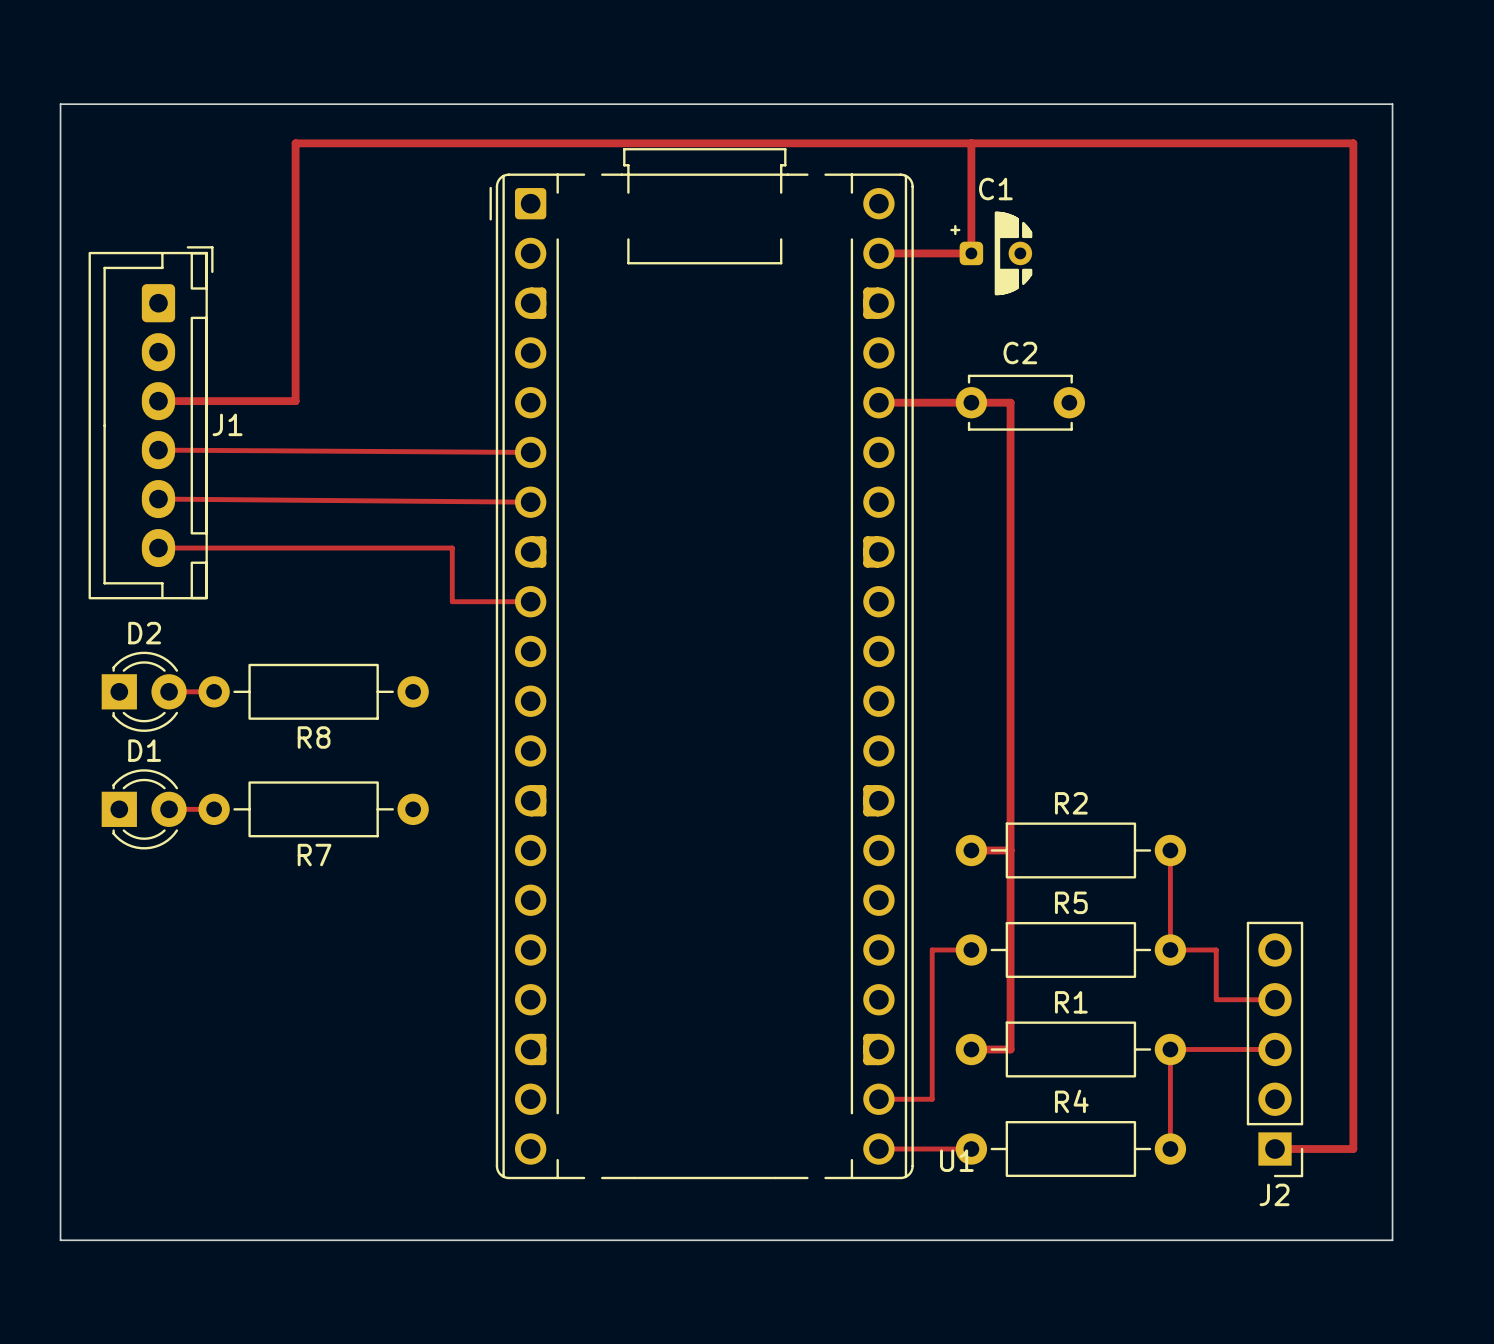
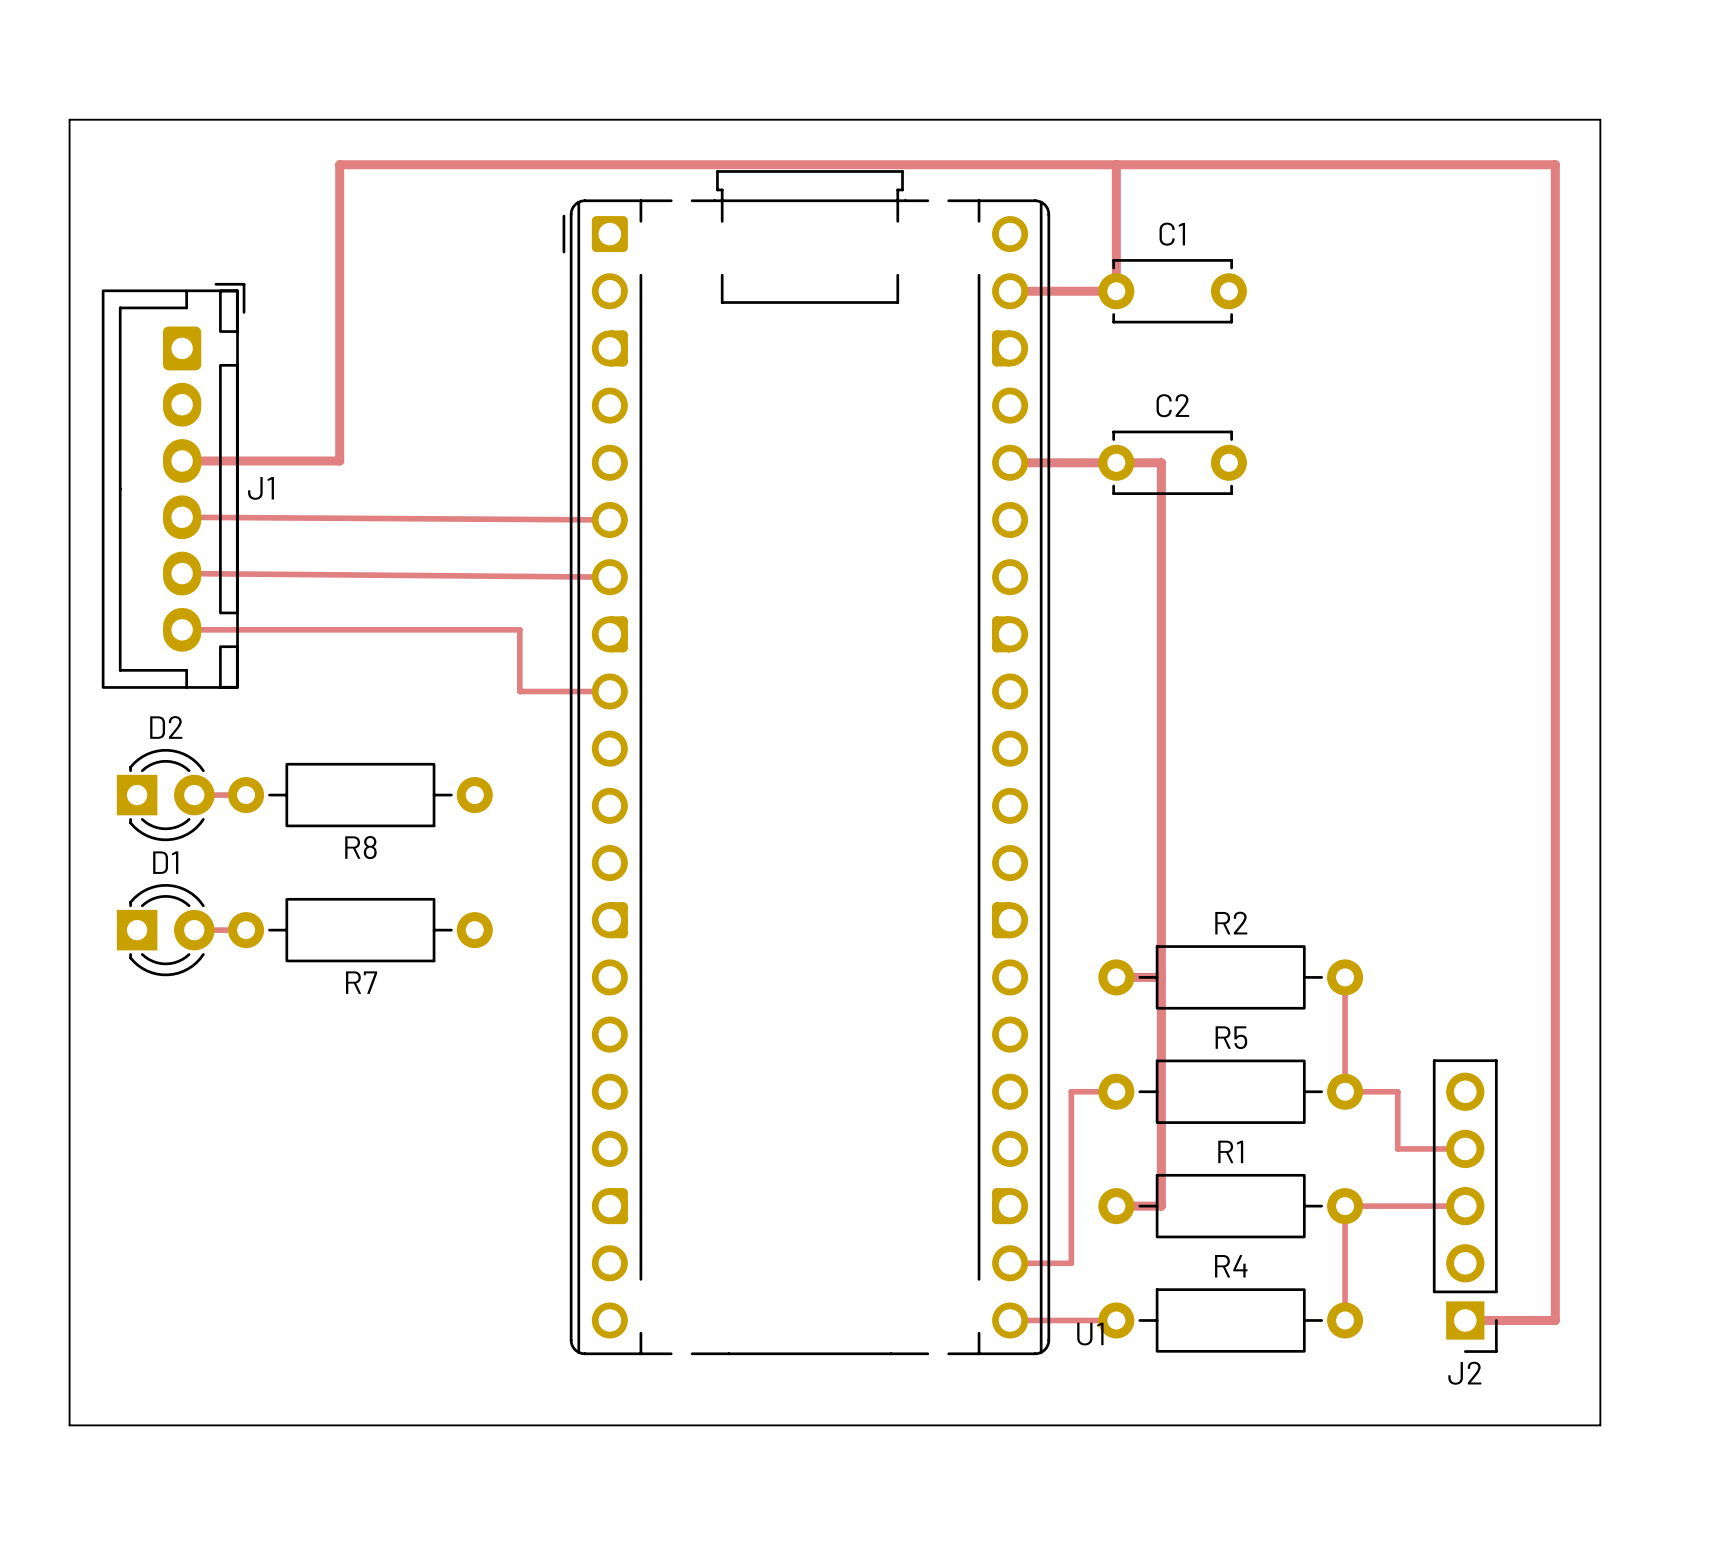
C1 footprint: [950, 211, 1033, 296] -> [1098, 259, 1247, 324]

